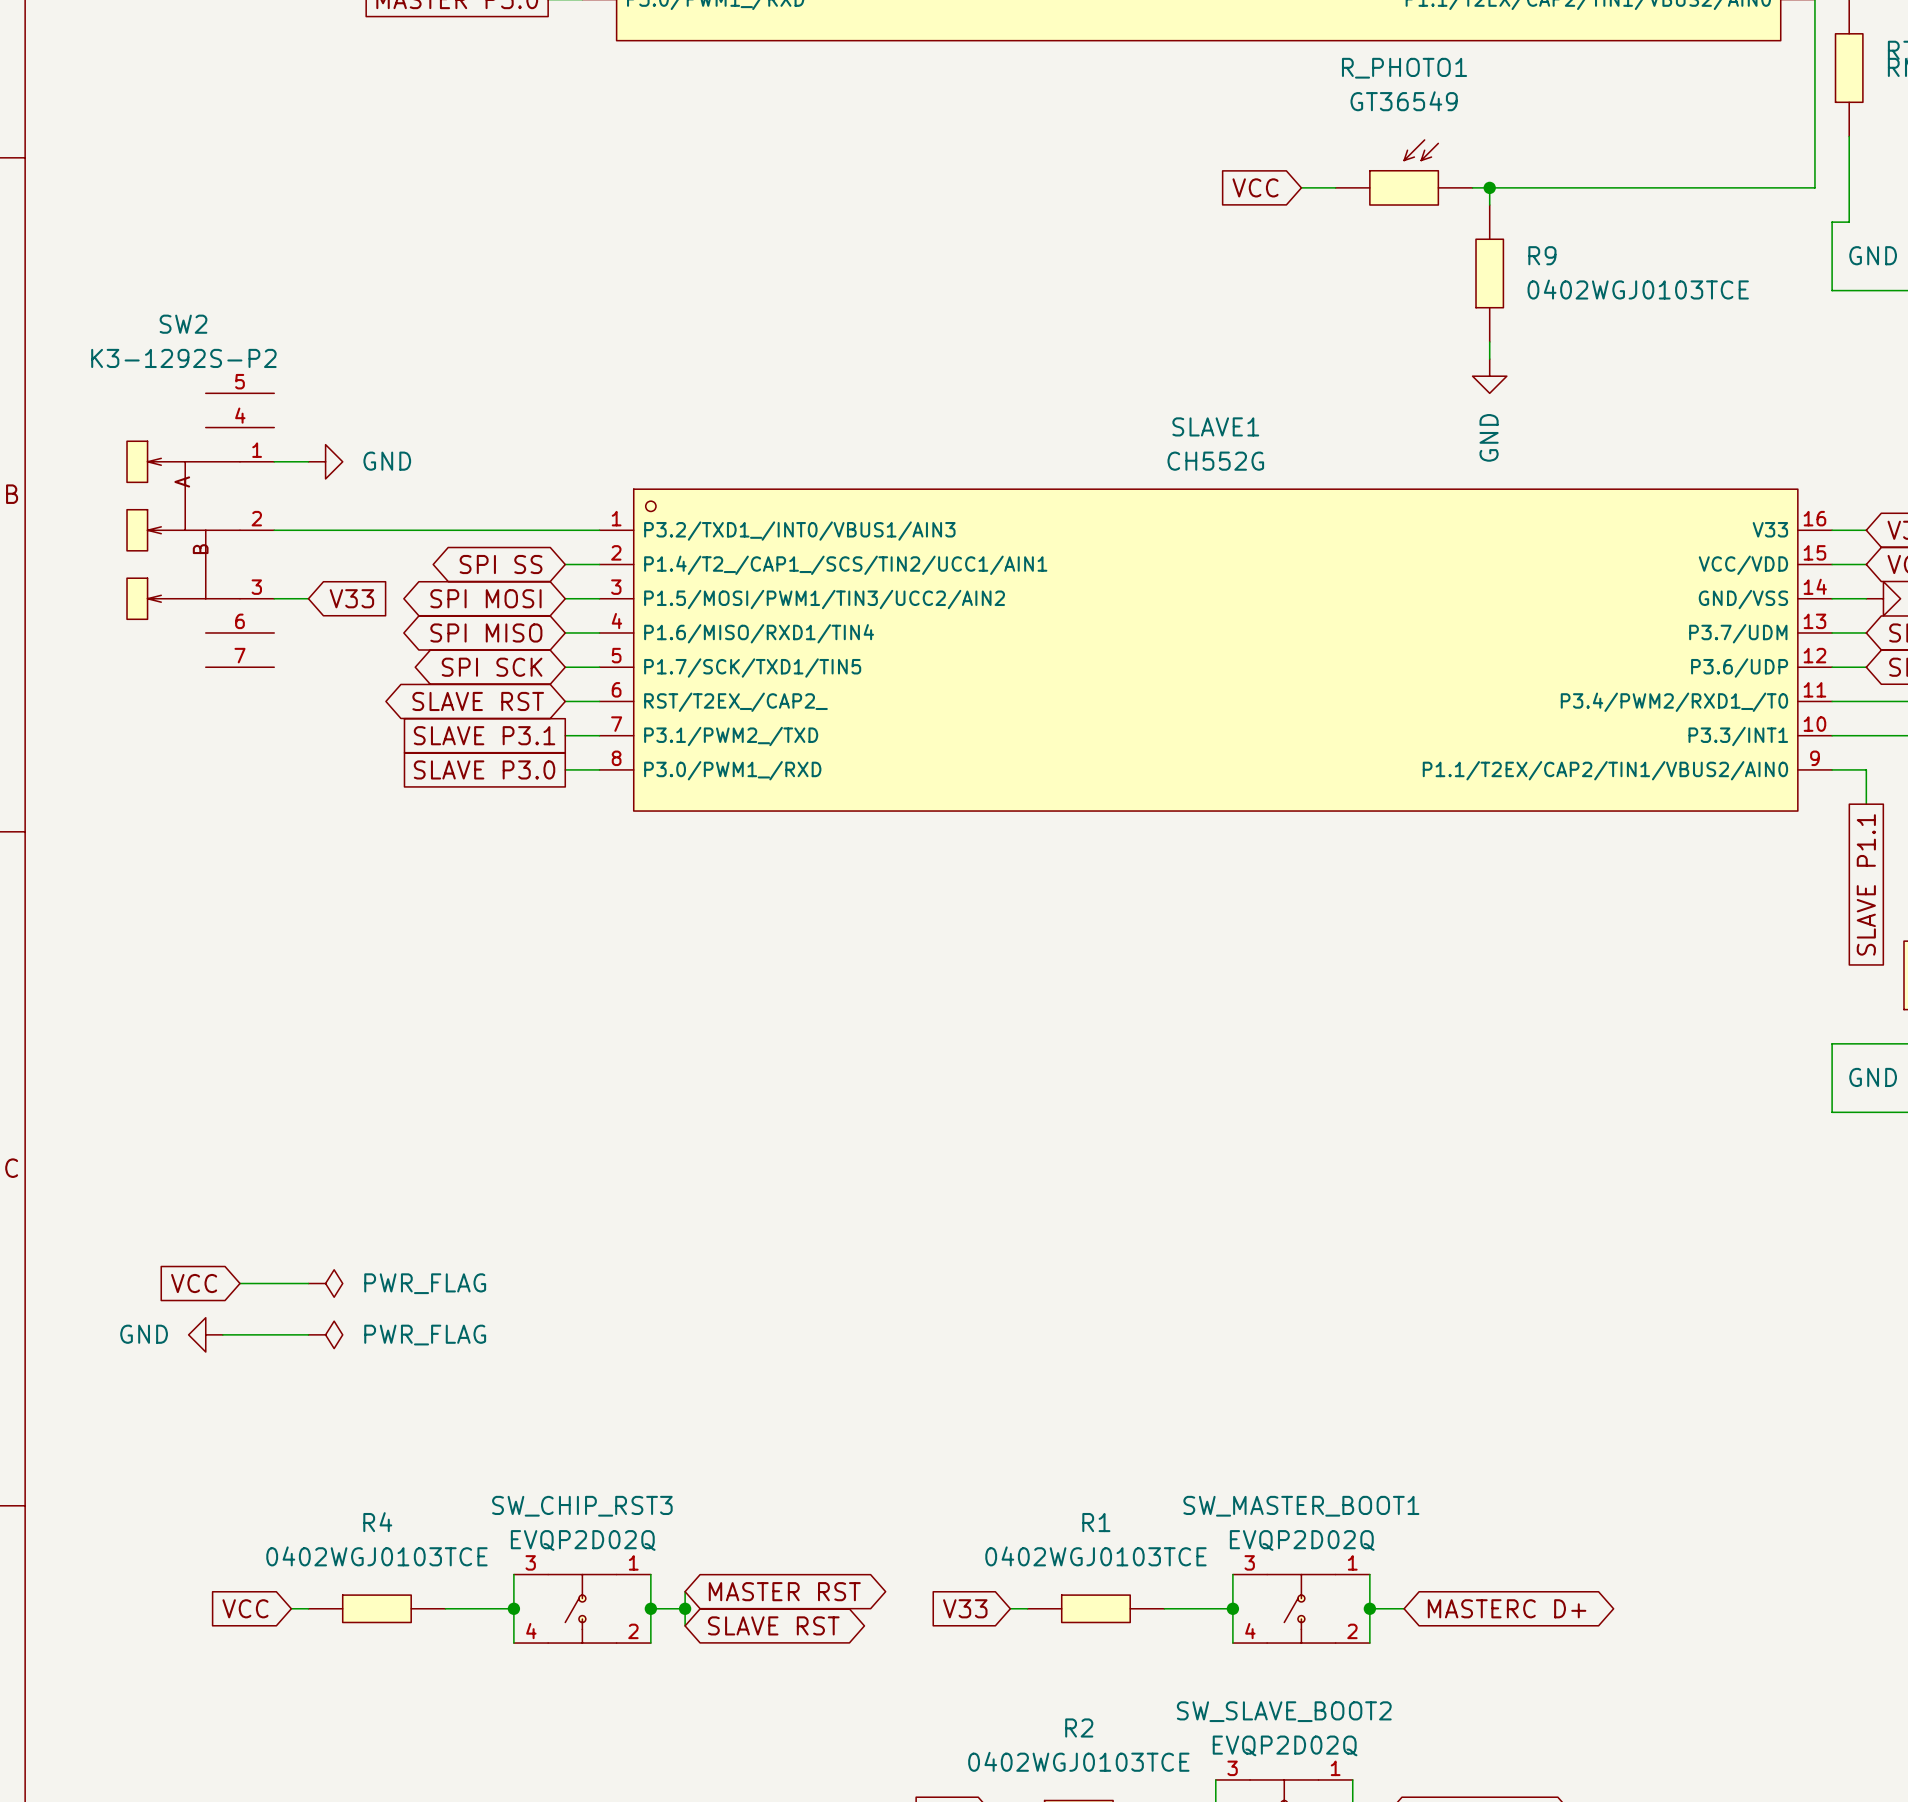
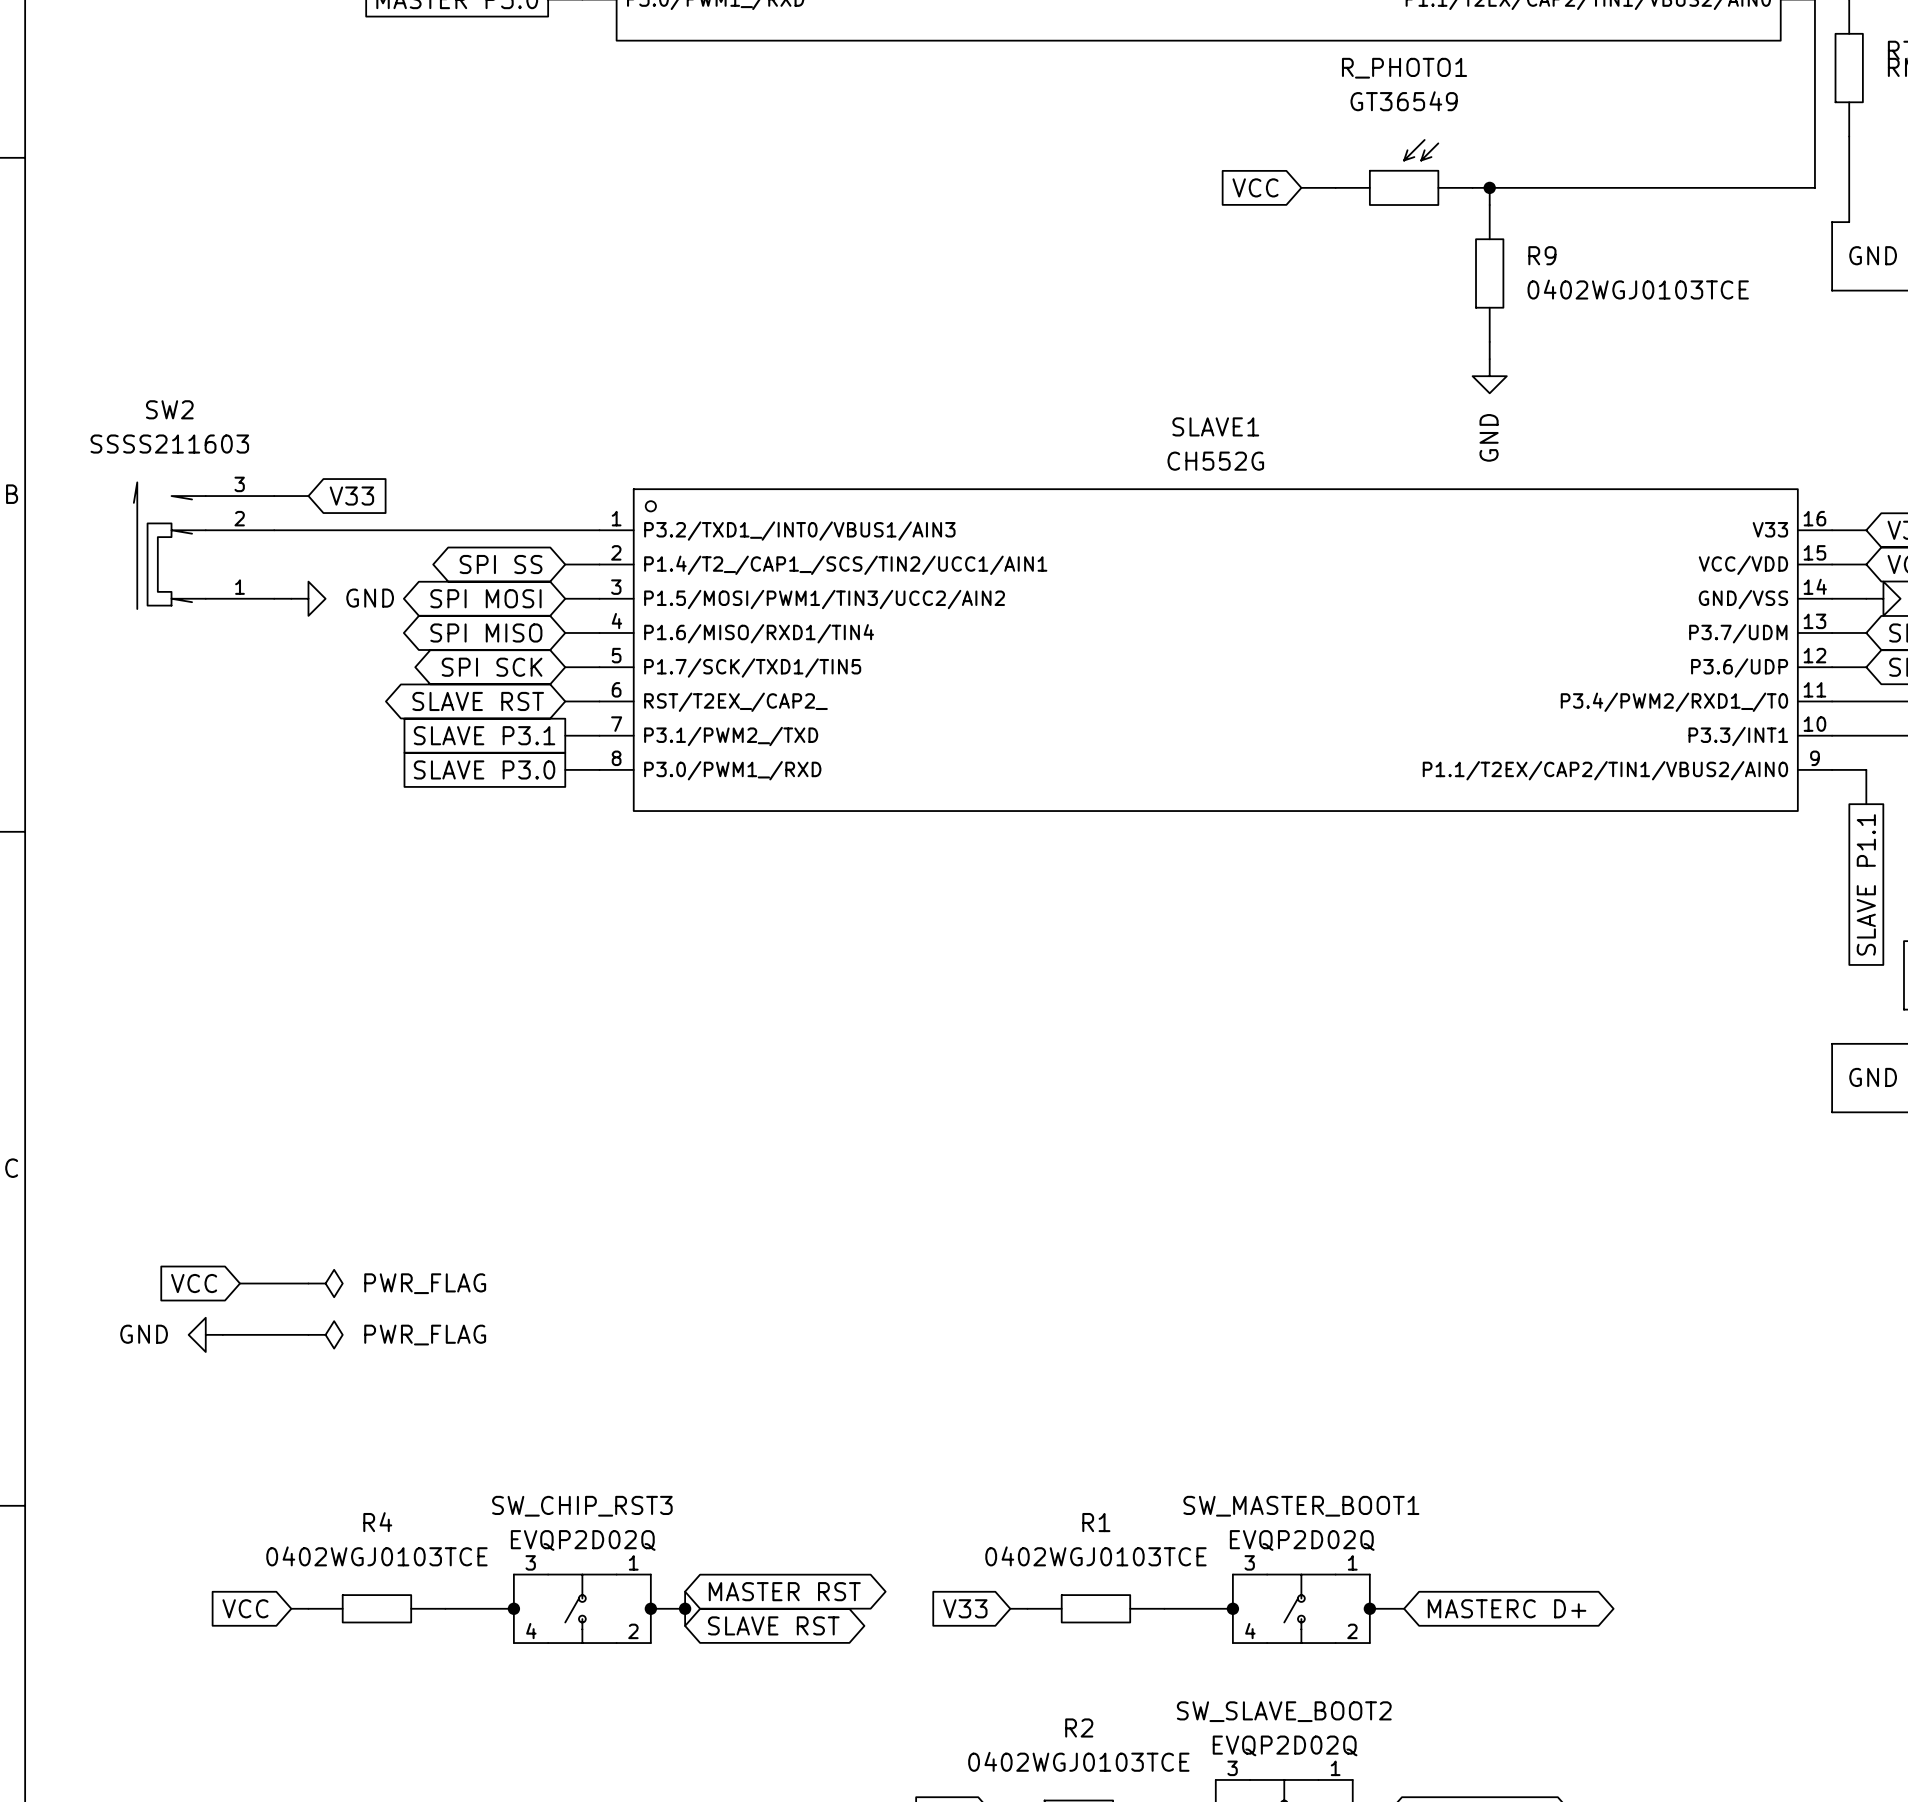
SW2 name position: SW2 (183, 324) -> SW2 (169, 409)
SW2 value: K3-1292S-P2 (183, 358) -> SSSS211603 (169, 444)
SW2 symbol: [127, 393, 275, 668] -> [133, 482, 275, 610]
wire: (274, 461) (308, 461) -> (274, 496) (308, 496)
power symbol position: GND (325, 461) -> GND (308, 598)
global label position: V33 (351, 598) -> V33 (351, 496)

